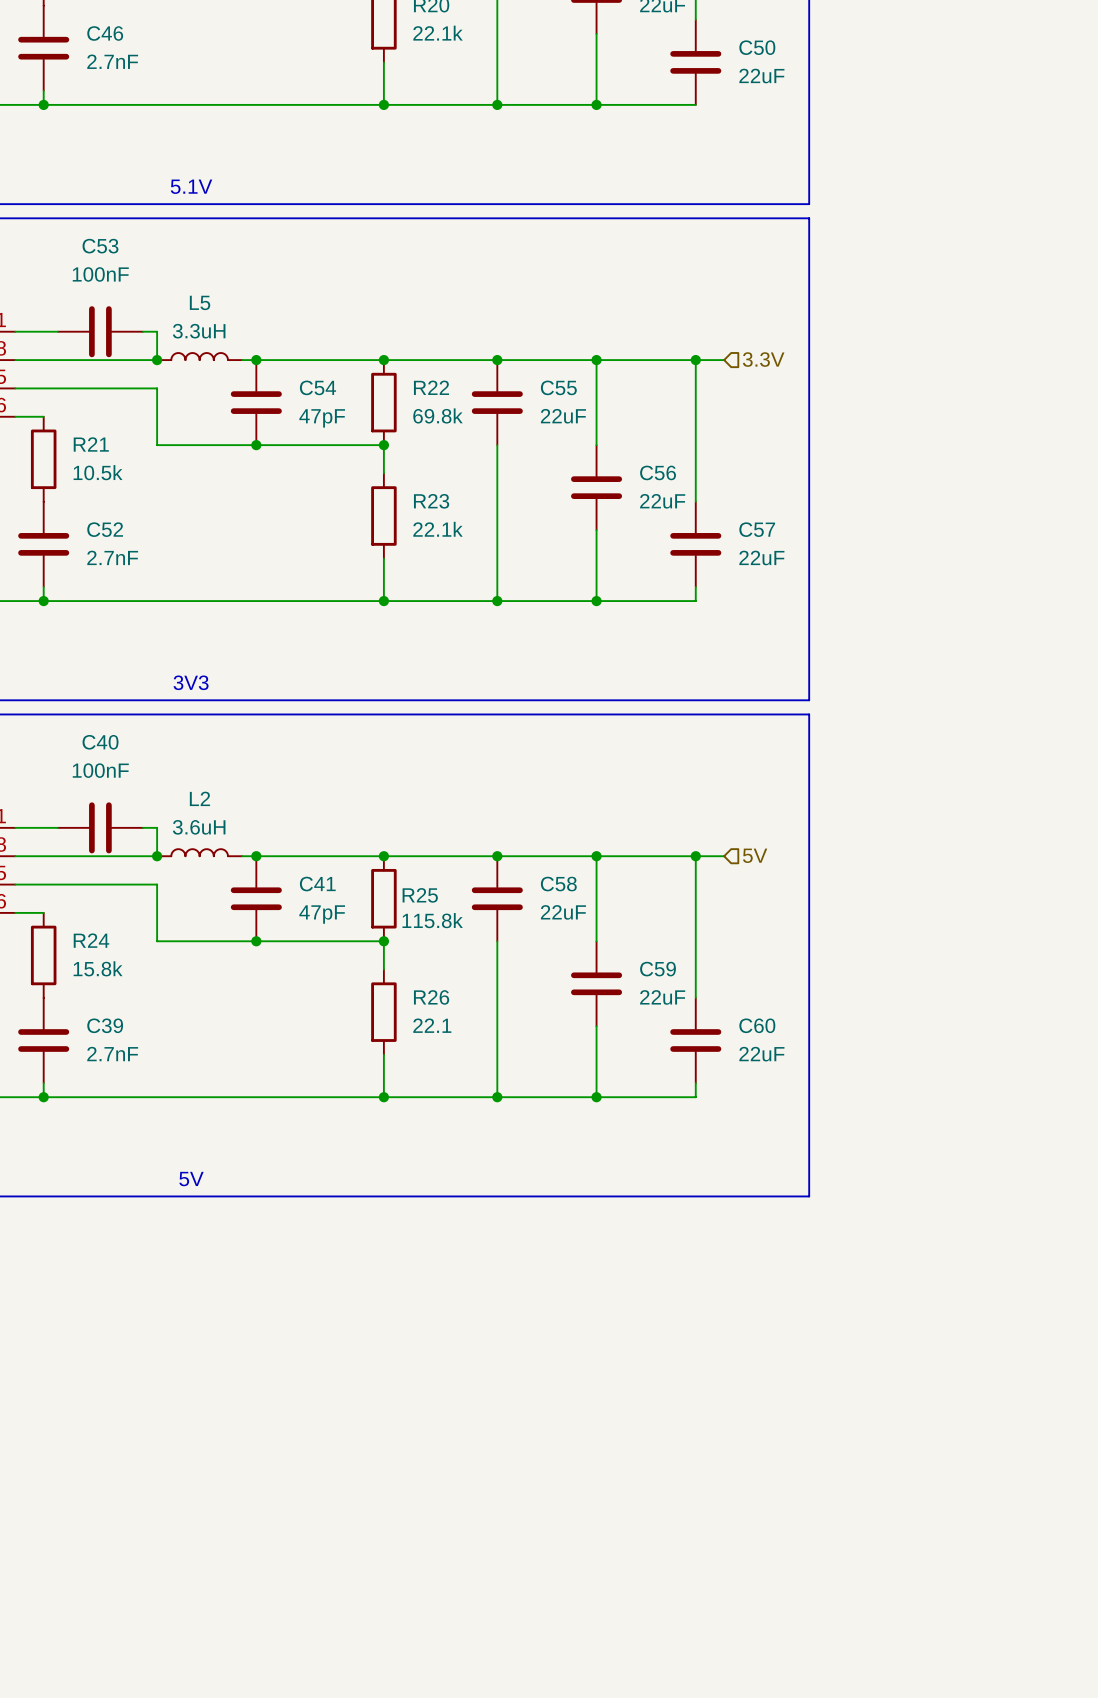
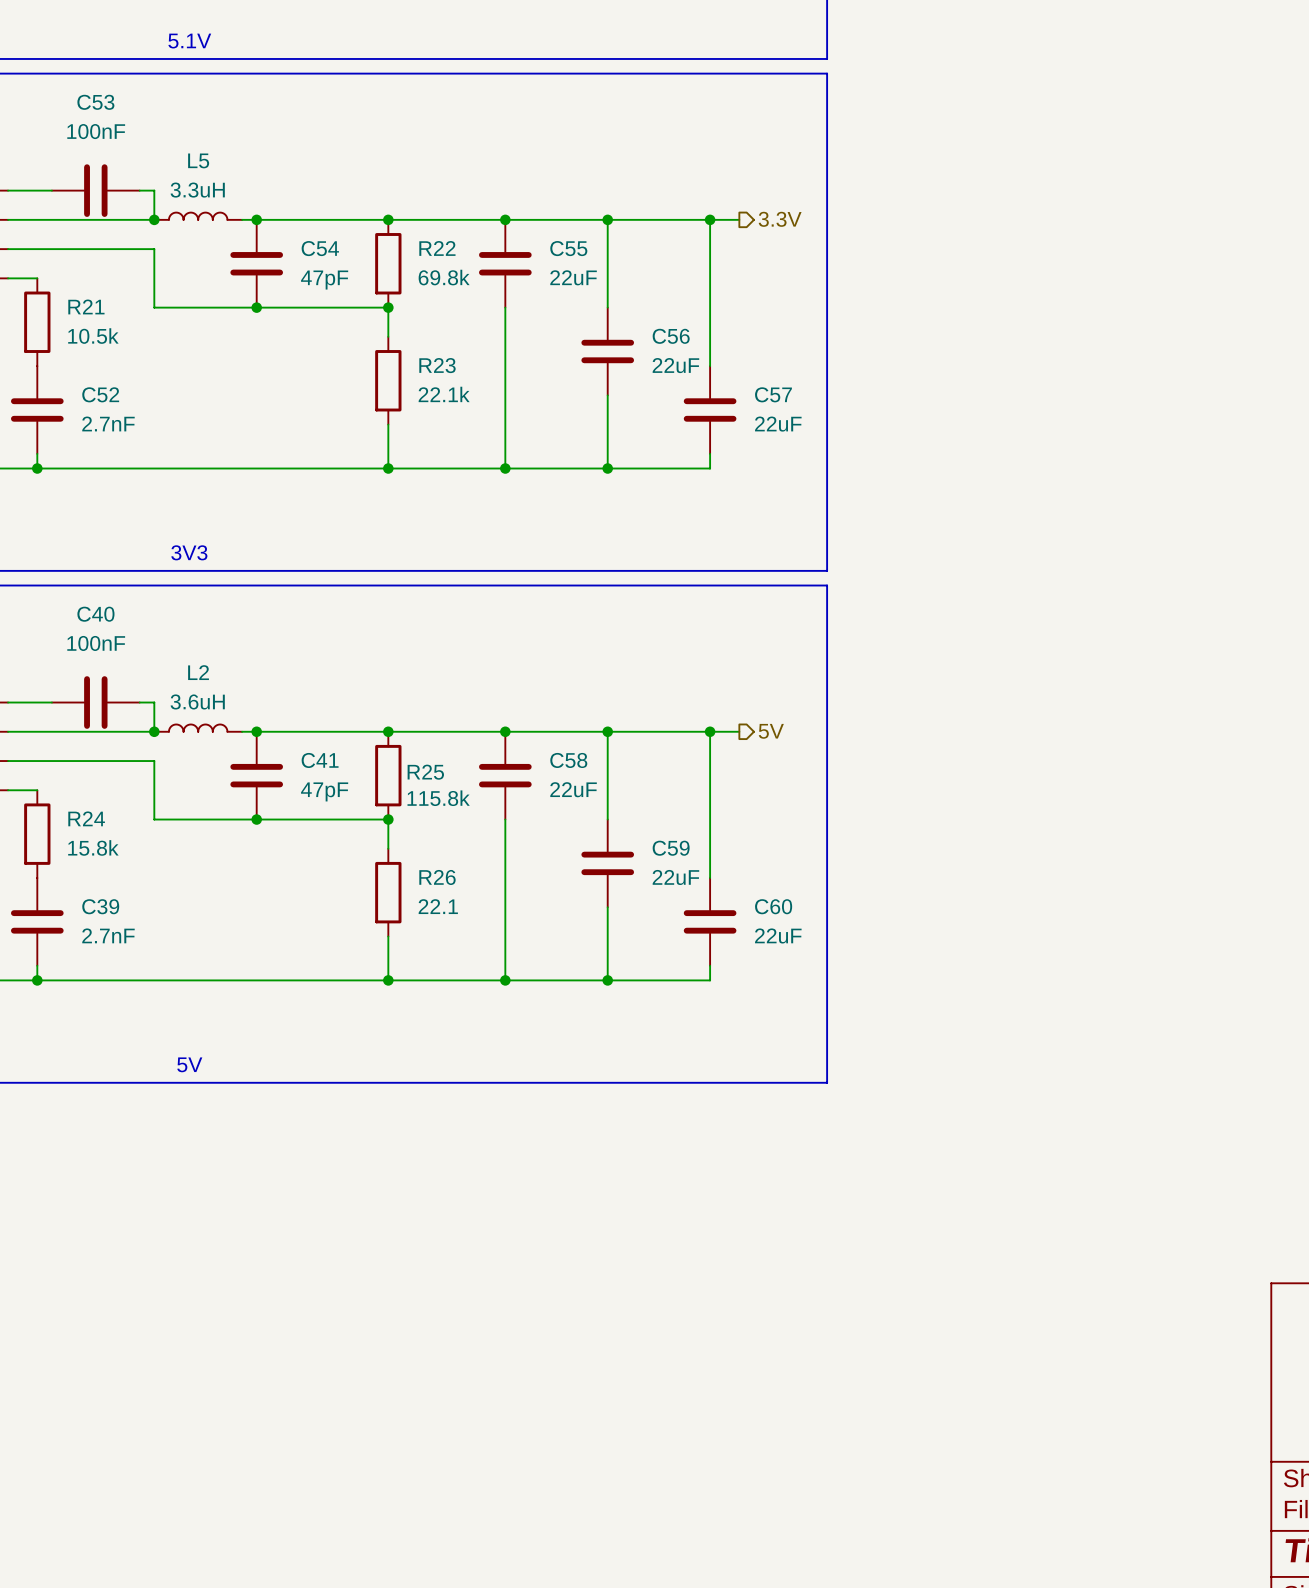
hierarchical label shape: input (763, 359) -> output (780, 219)
hierarchical label shape: input (755, 855) -> output (771, 731)

